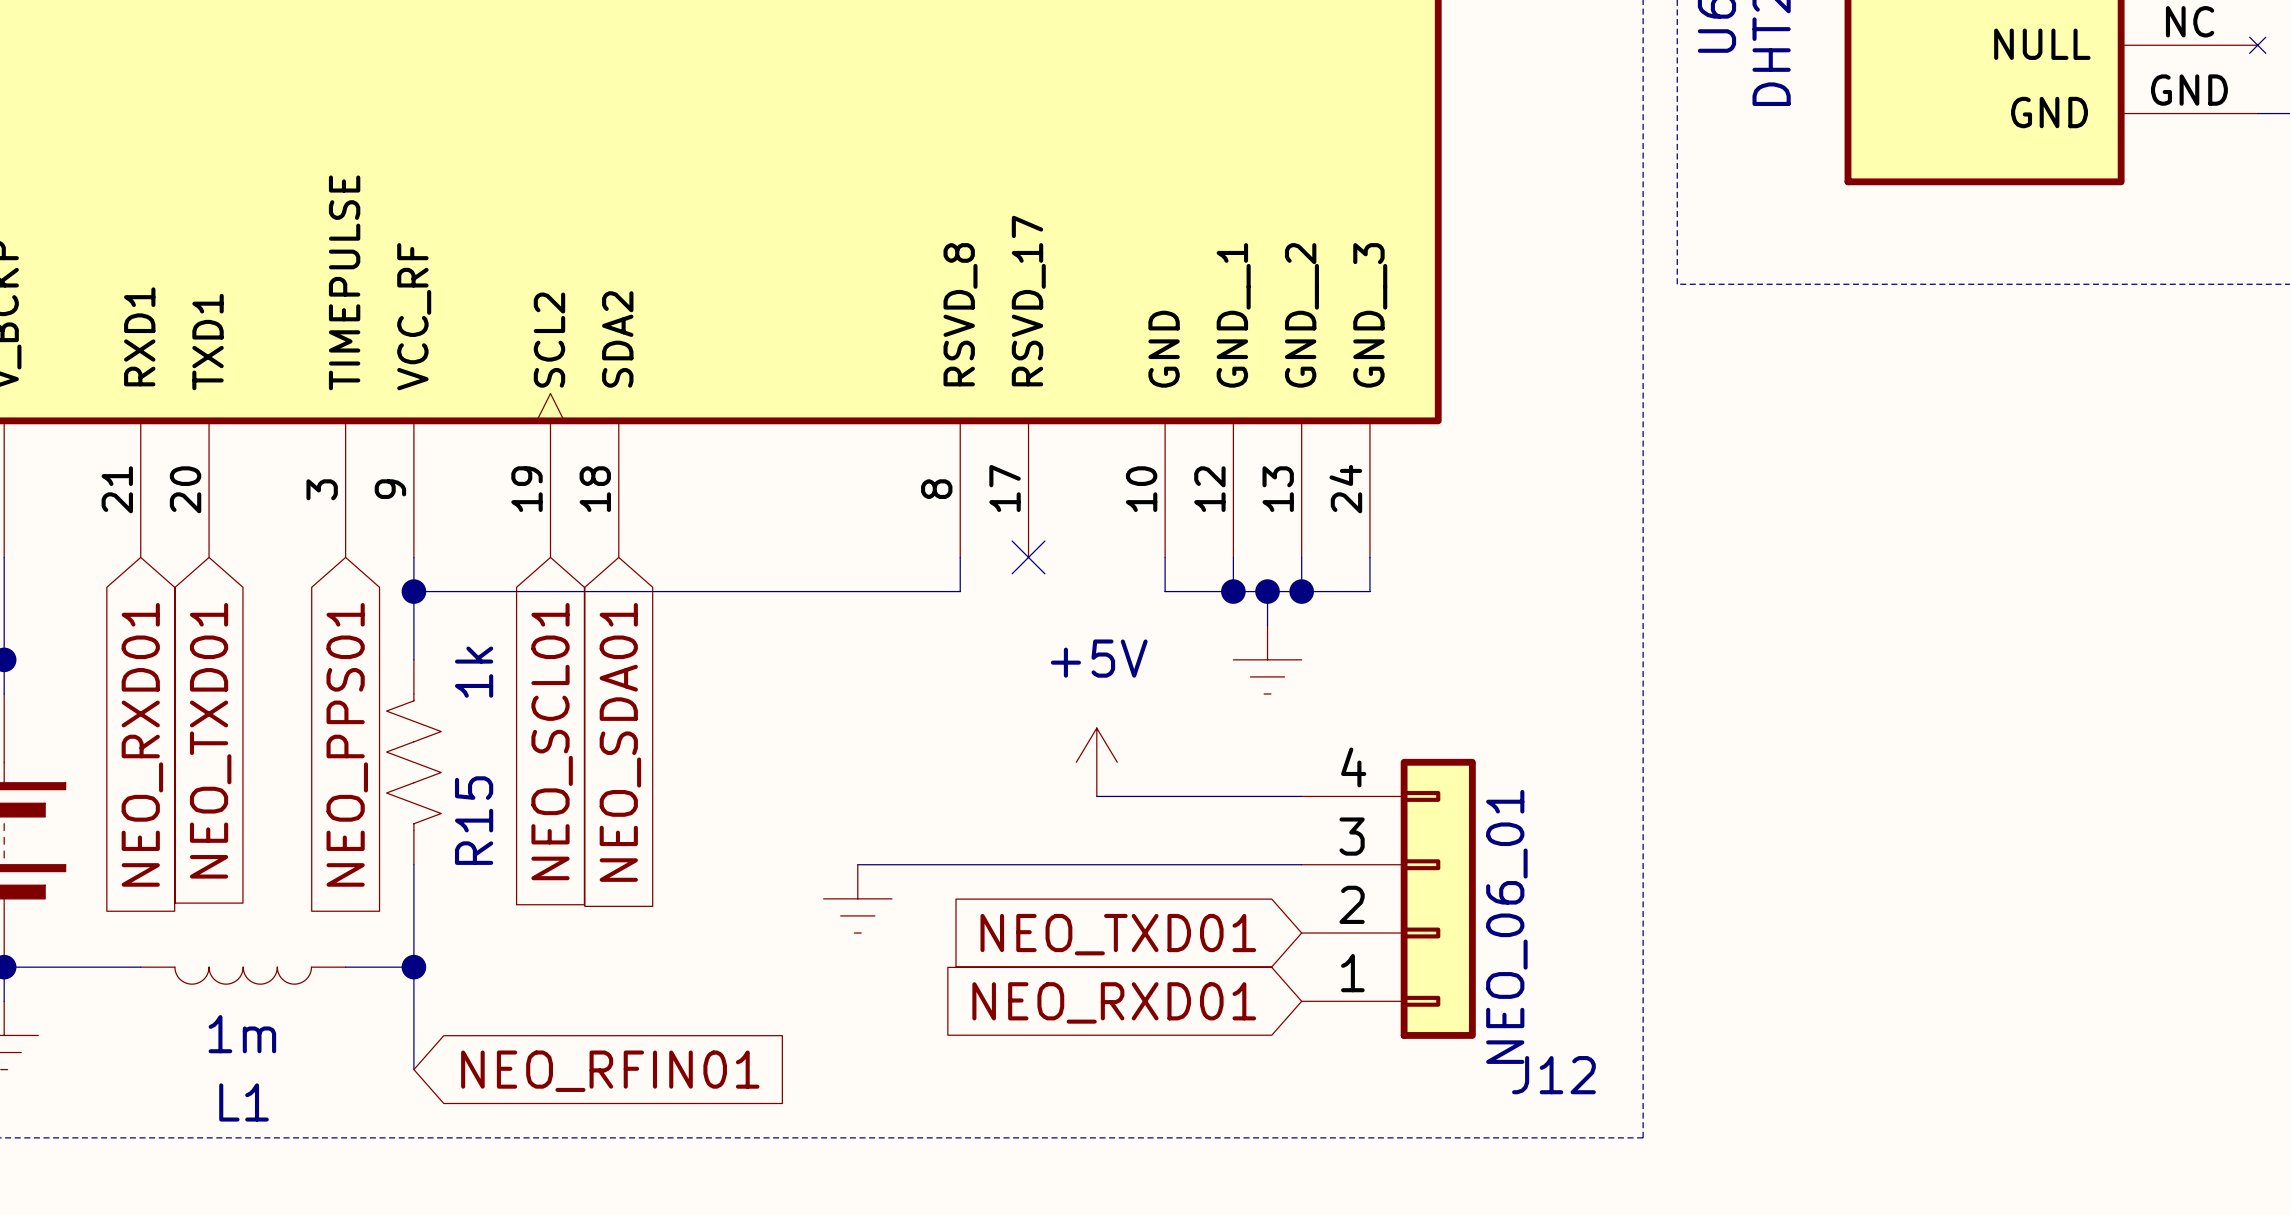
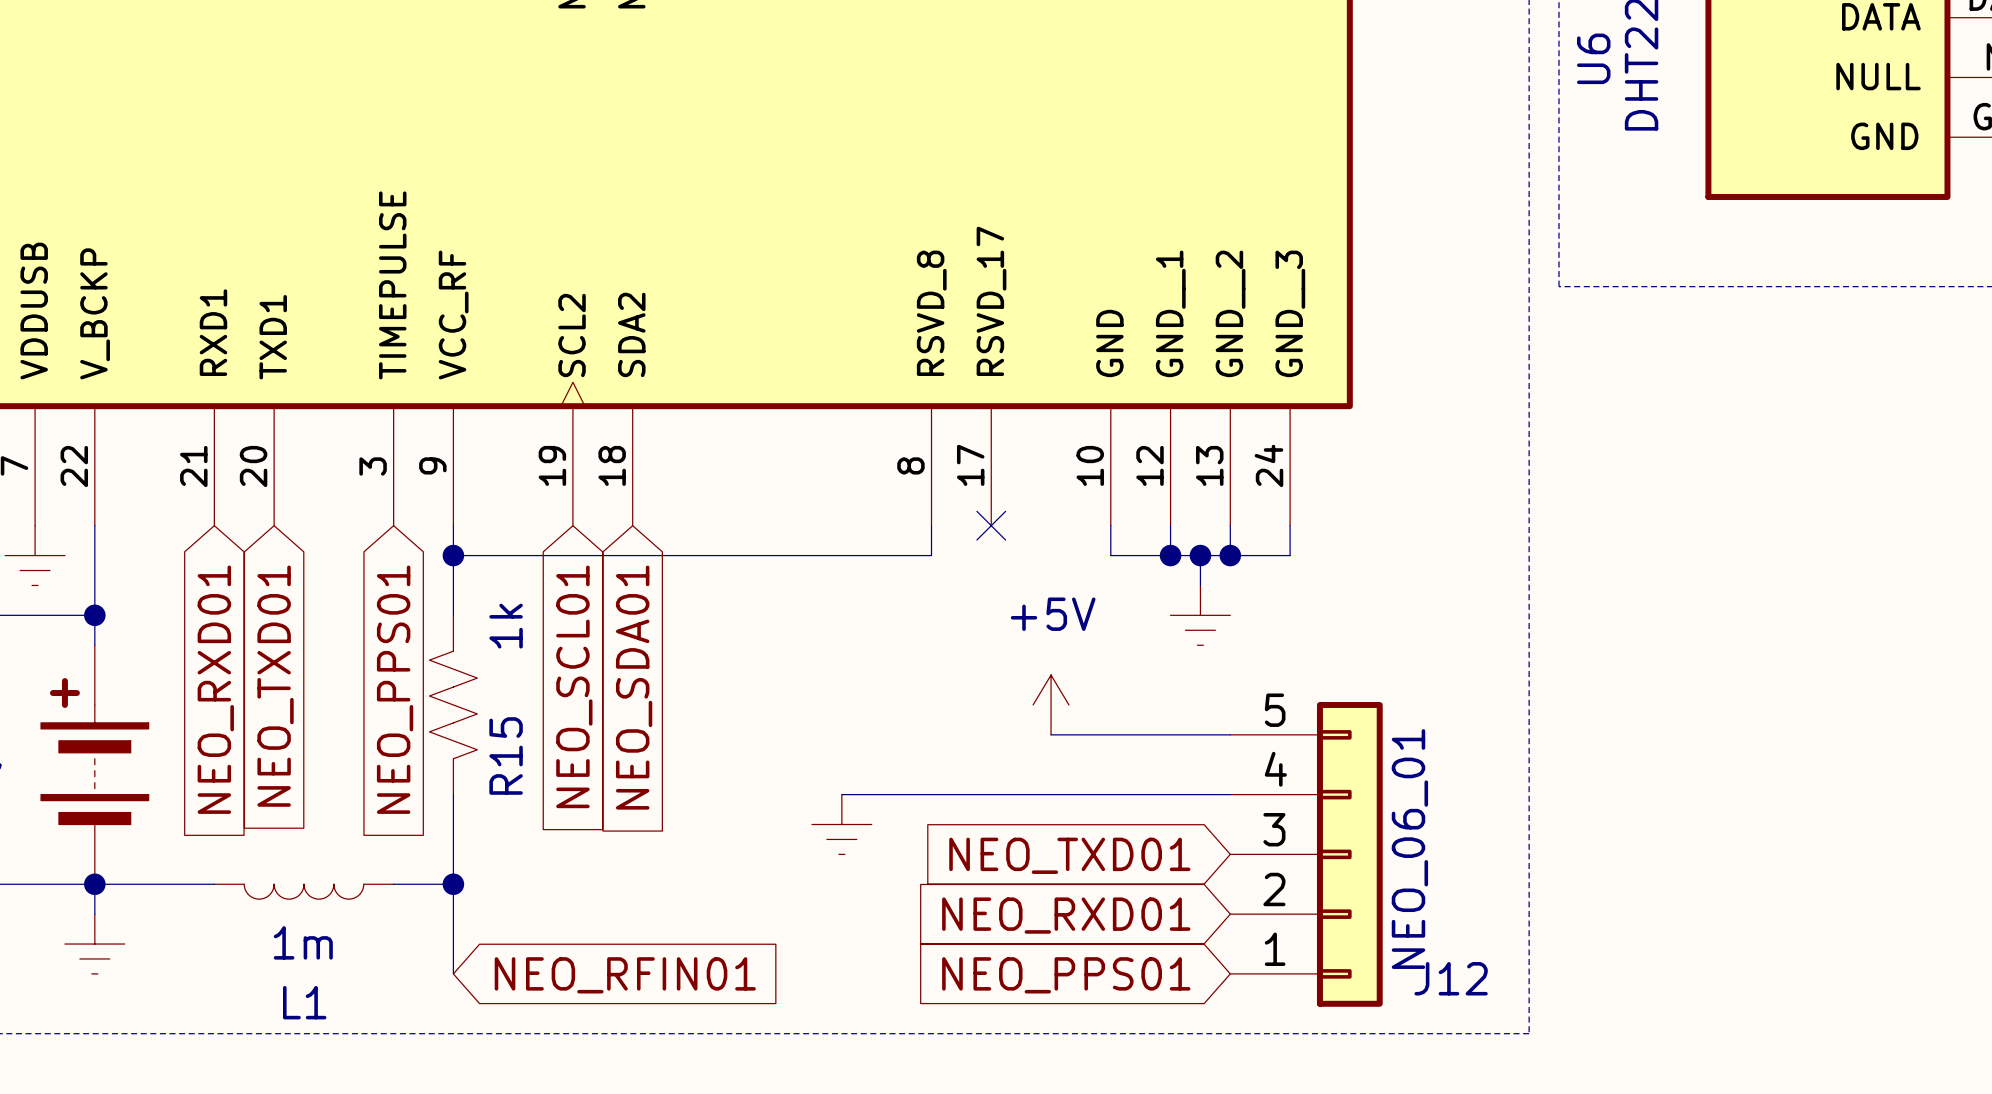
J12 symbol: [1301, 758, 1476, 1039] -> [1230, 701, 1383, 1007]
global label: none -> NEO_PPS01 (1066, 975)

